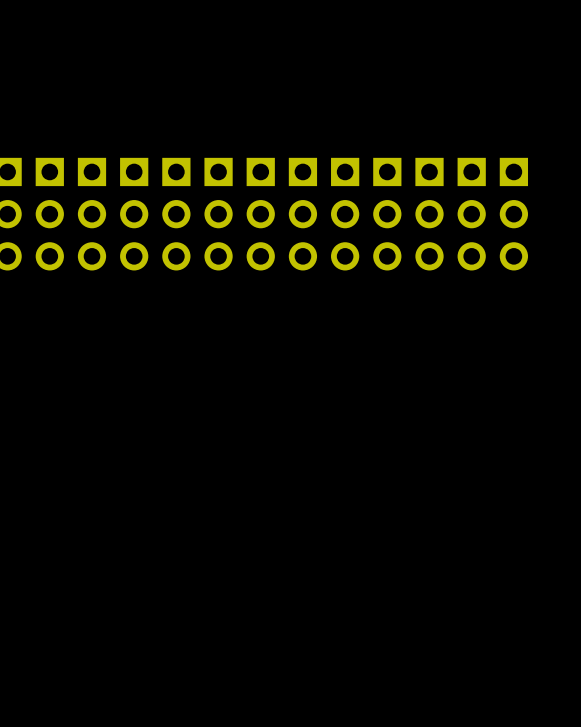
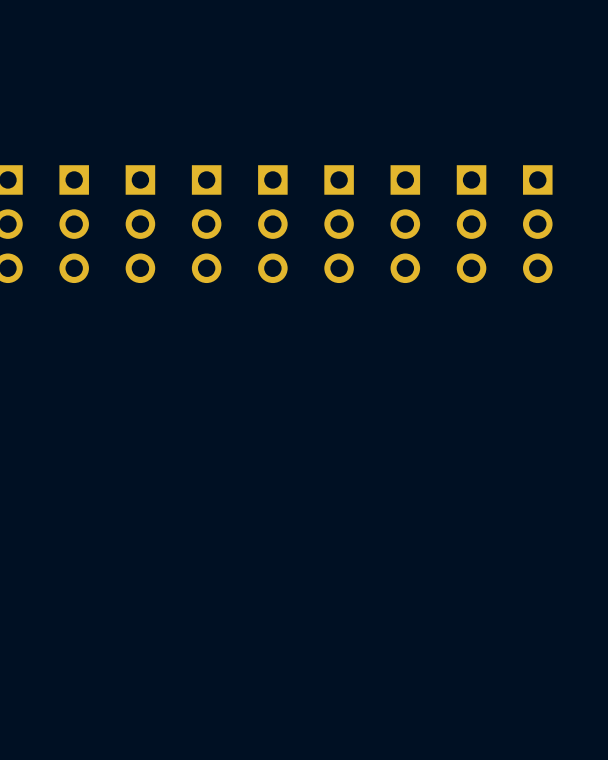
part: (49, 214) -> none
part: none -> (74, 224)
part: (91, 214) -> none
part: (176, 214) -> none
part: none -> (206, 224)
part: (218, 214) -> none
part: (302, 214) -> none
part: none -> (339, 224)
part: (345, 214) -> none
part: (429, 214) -> none
part: none -> (471, 224)
part: (471, 214) -> none

